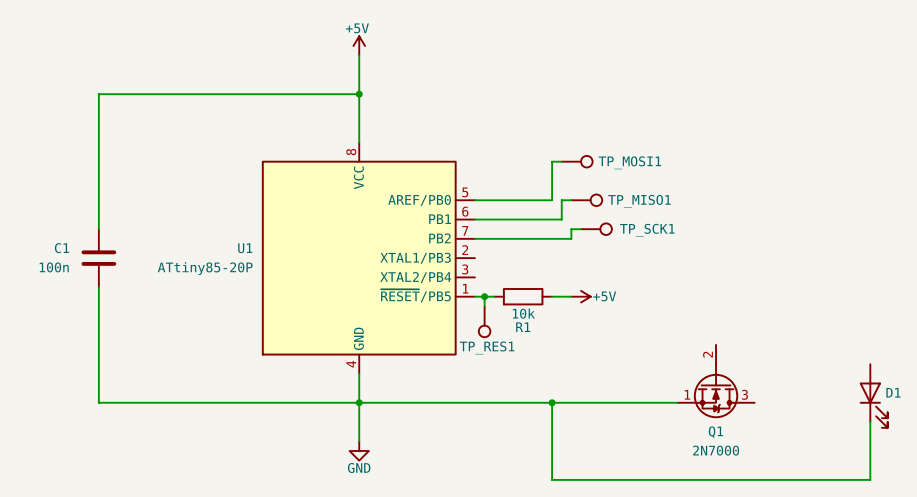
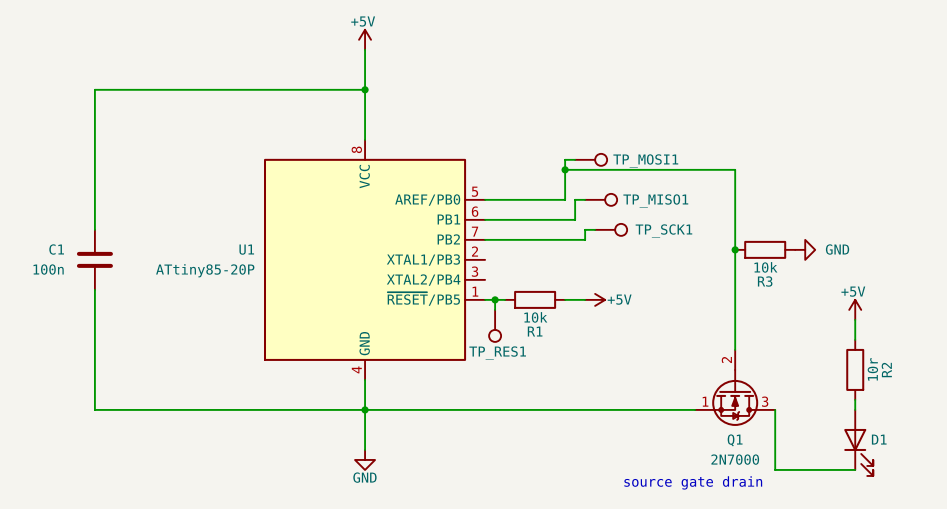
wire: none -> (565, 169) (735, 169) (735, 349)
junction: none -> (565, 169)
junction: none -> (735, 249)
R3: none -> 10k (765, 249)
power symbol: none -> GND (805, 249)
power symbol: none -> +5V (855, 309)
wire: none -> (855, 319) (855, 339)
R2: none -> 10r (855, 369)
wire: none -> (855, 399) (855, 409)
D1 position: (873, 396) -> (858, 442)
wire: (552, 402) (552, 479) (870, 479) (870, 422) -> none
junction: (552, 402) -> none
wire: none -> (775, 409) (775, 469) (855, 469)
text: none -> source gate drain (693, 482)

